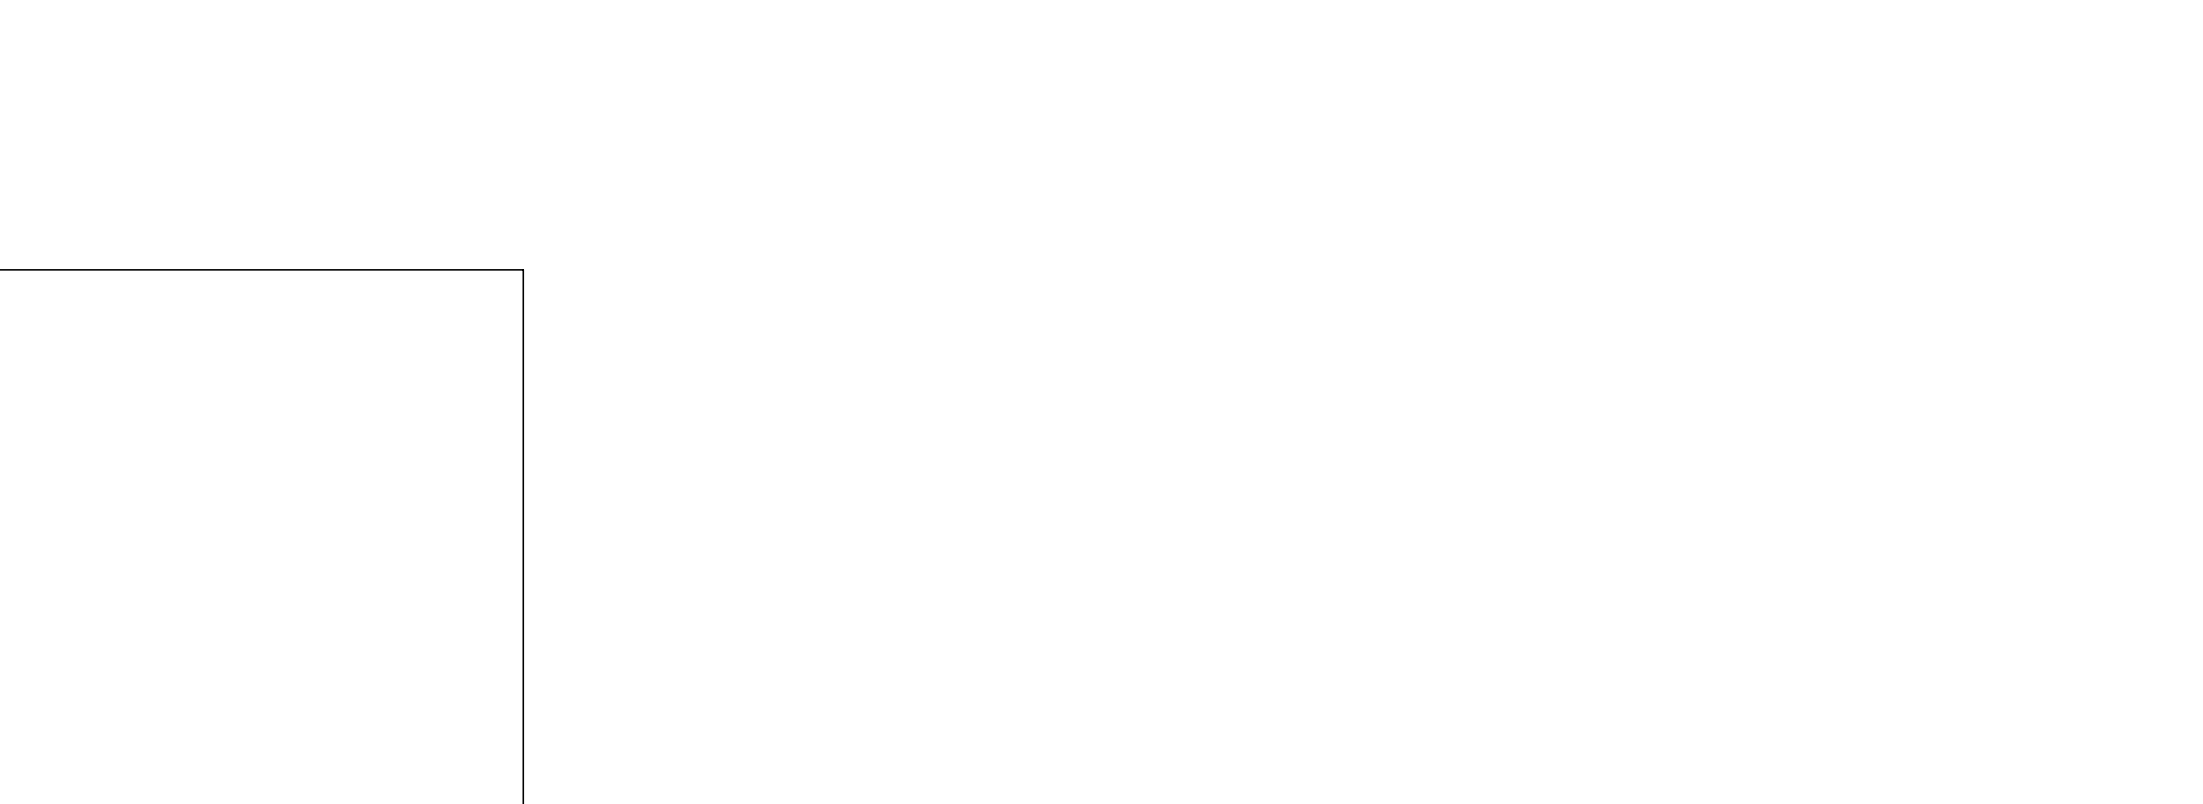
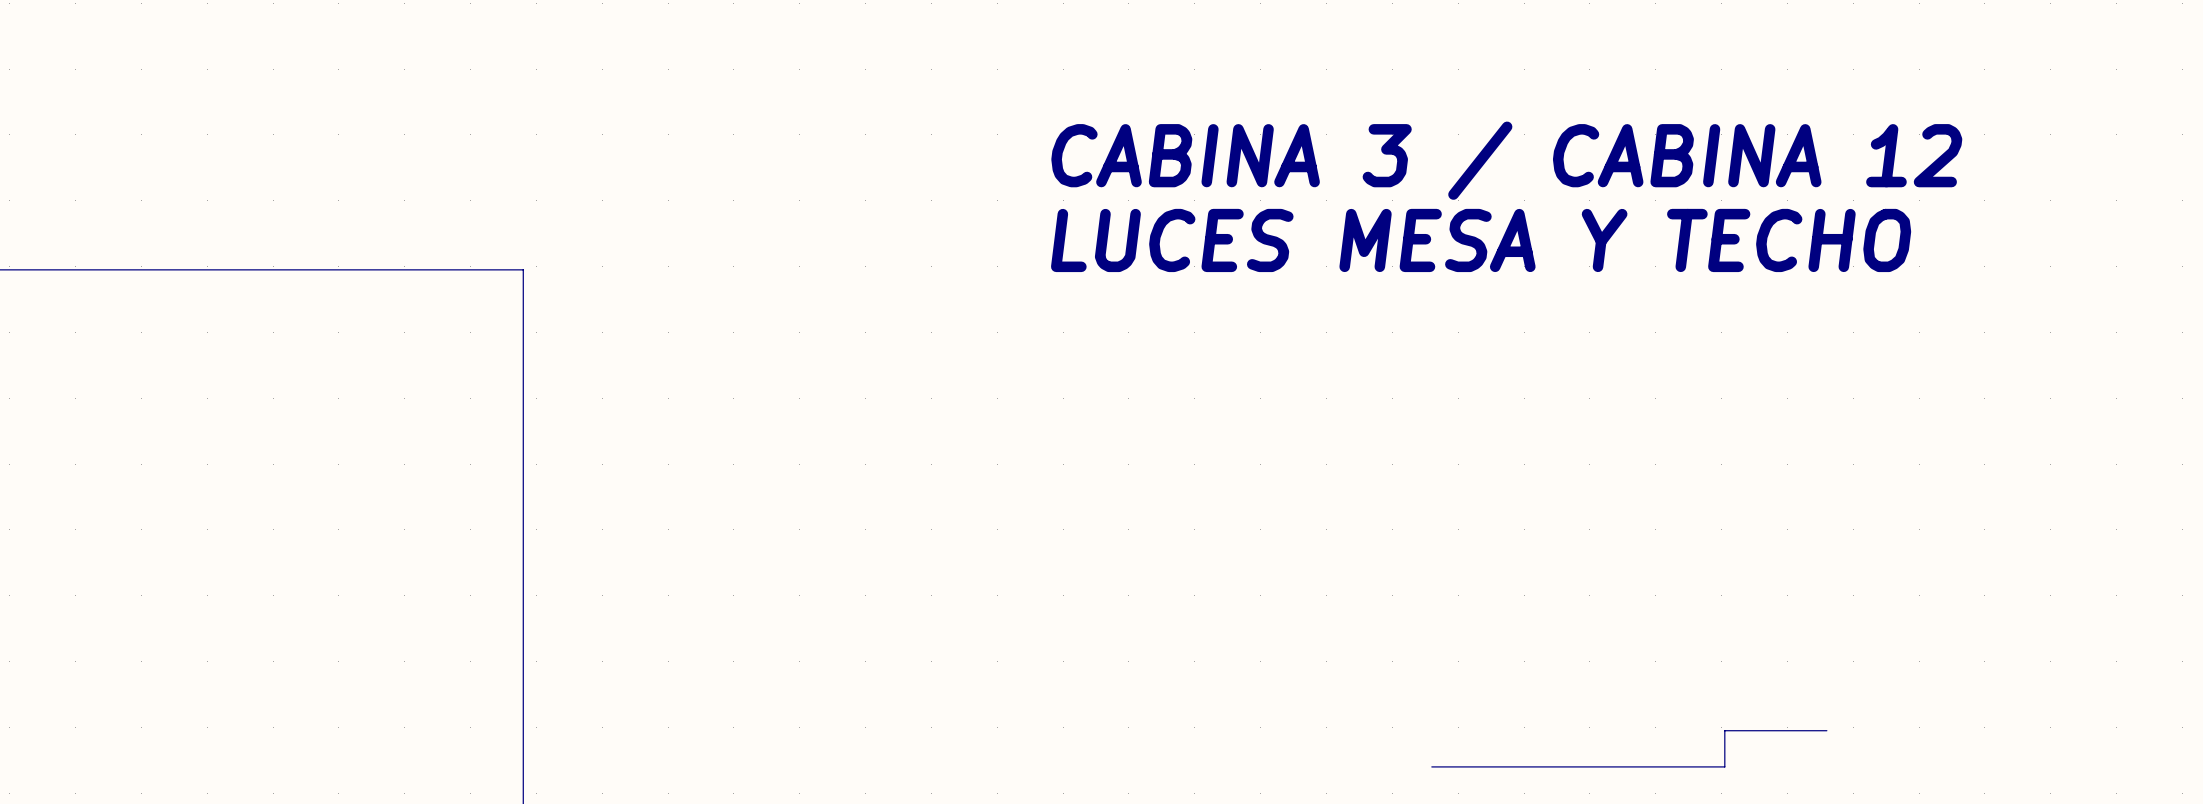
text: none -> CABINA 3 / CABINA 12 (1506, 160)
text: none -> LUCES MESA Y TECHO (1481, 240)
wire: none -> (1826, 730) (1724, 730) (1724, 766) (1431, 766)

